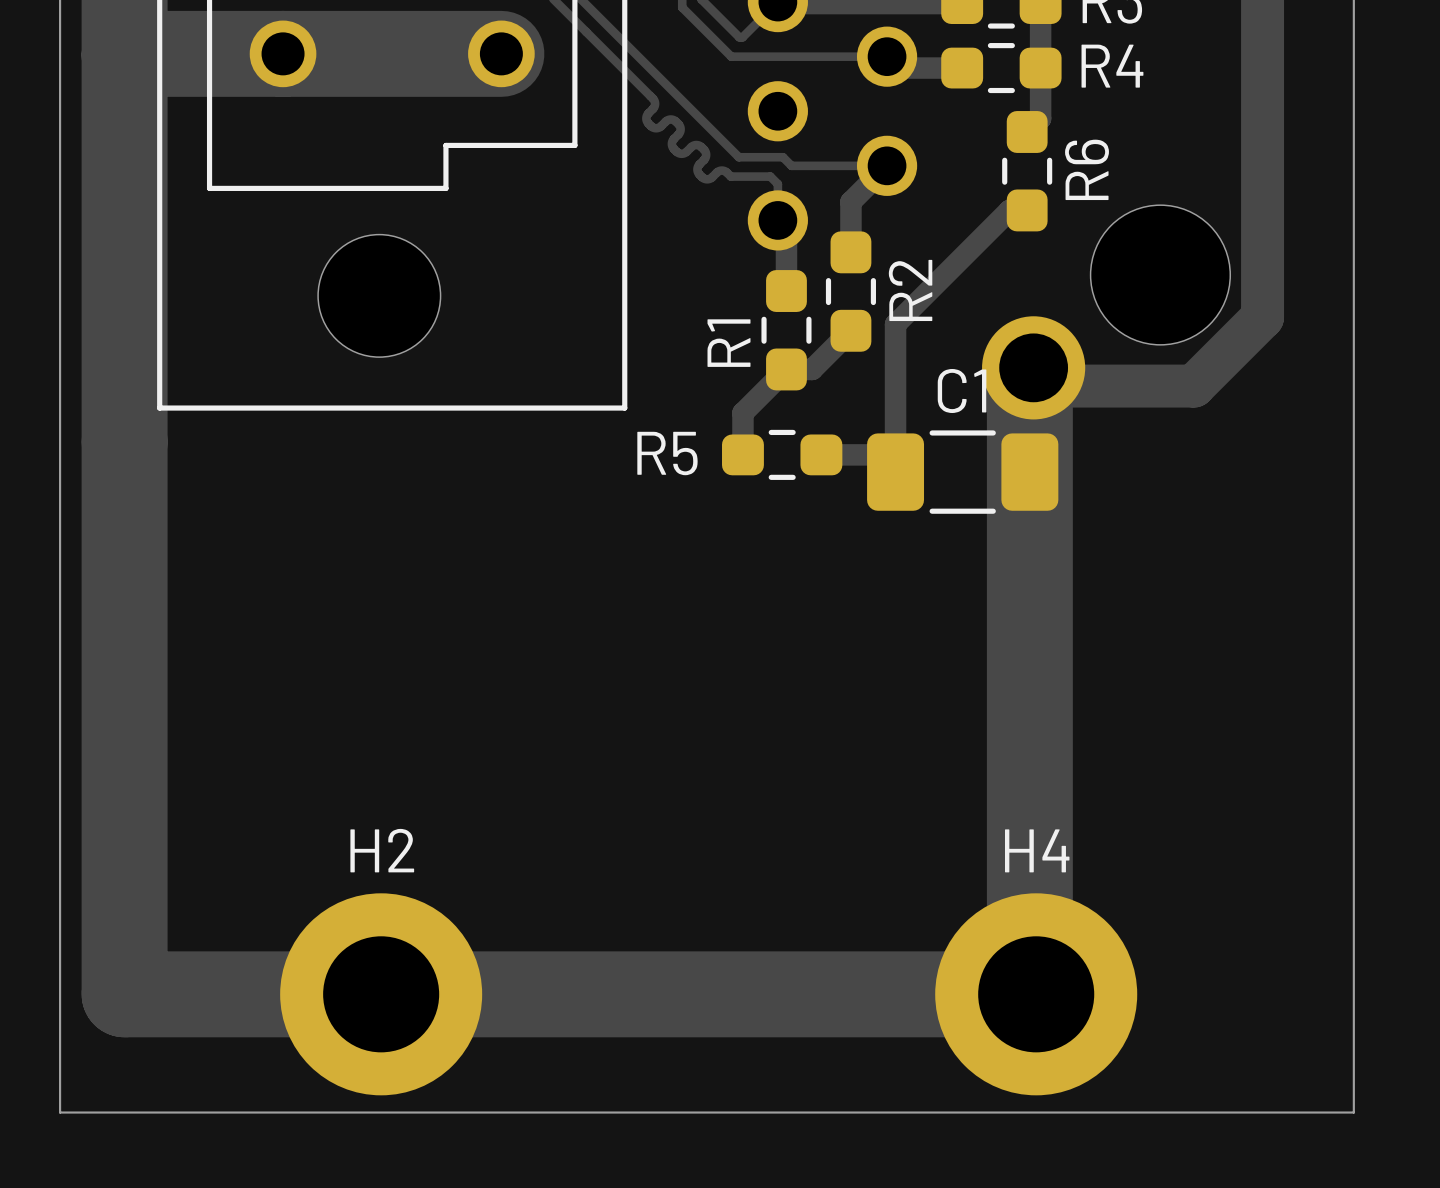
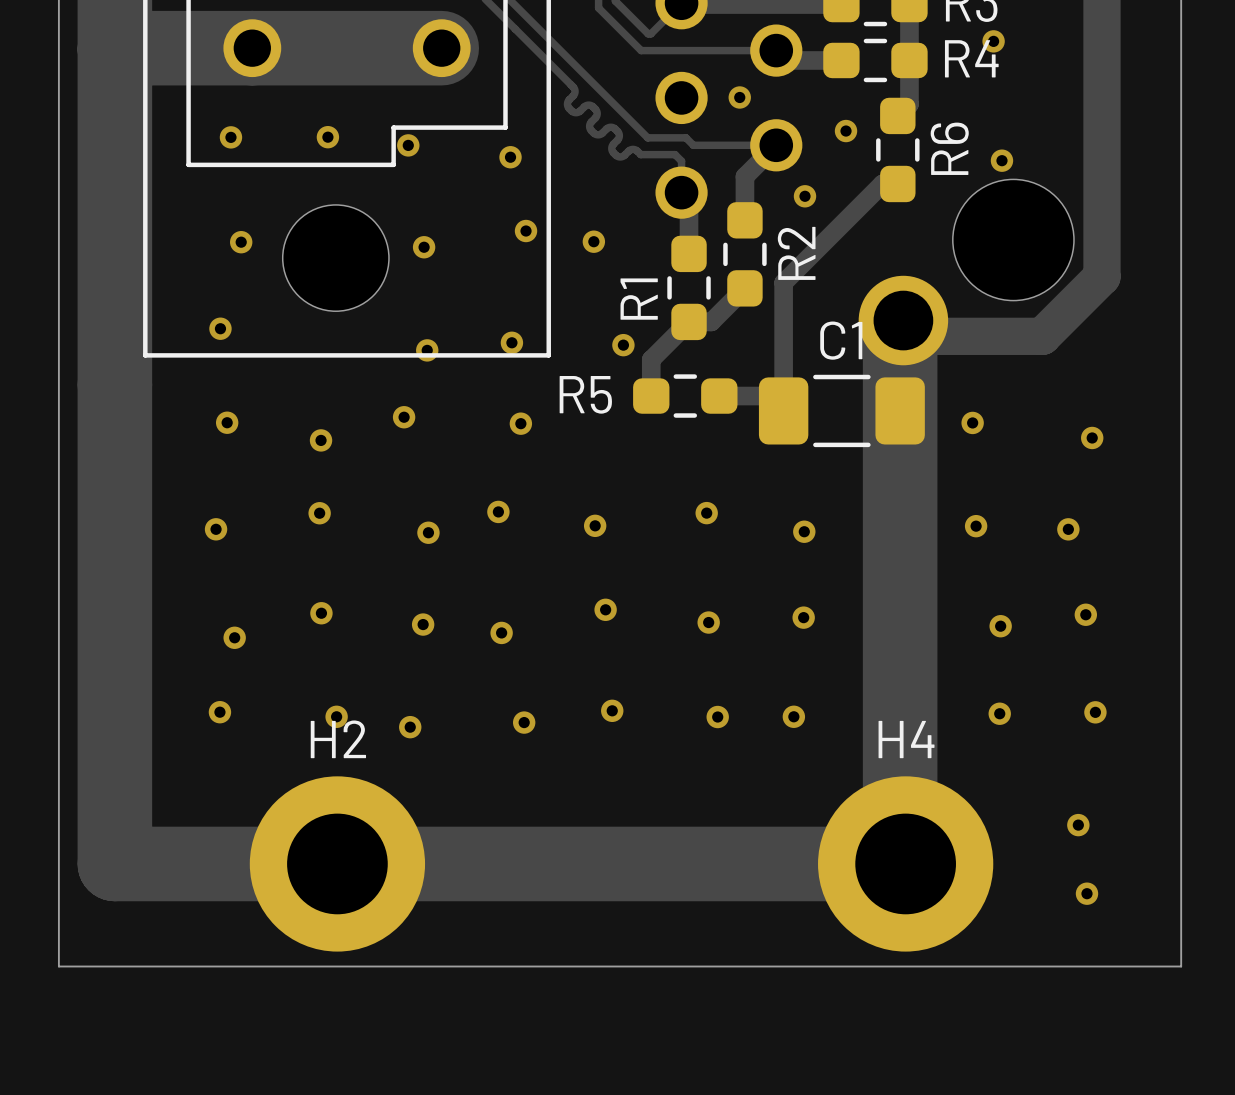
via: none -> (993, 41)
via: none -> (739, 97)
via: none -> (846, 131)
via: none -> (230, 137)
via: none -> (327, 137)
via: none -> (408, 145)
via: none -> (510, 157)
via: none -> (1001, 160)
via: none -> (805, 196)
via: none -> (526, 231)
via: none -> (593, 241)
via: none -> (241, 242)
via: none -> (424, 247)
via: none -> (220, 328)
via: none -> (511, 342)
via: none -> (623, 345)
via: none -> (427, 350)
via: none -> (404, 417)
via: none -> (227, 422)
via: none -> (972, 422)
via: none -> (520, 423)
via: none -> (1092, 437)
via: none -> (321, 440)
via: none -> (498, 511)
via: none -> (706, 513)
via: none -> (319, 513)
via: none -> (595, 525)
via: none -> (976, 526)
via: none -> (216, 529)
via: none -> (1068, 529)
via: none -> (804, 531)
via: none -> (428, 532)
via: none -> (605, 609)
via: none -> (321, 613)
via: none -> (1085, 614)
via: none -> (803, 617)
via: none -> (708, 622)
via: none -> (423, 624)
via: none -> (1000, 626)
via: none -> (501, 632)
via: none -> (234, 637)
via: none -> (612, 710)
via: none -> (219, 712)
via: none -> (1095, 712)
via: none -> (999, 713)
via: none -> (336, 716)
via: none -> (717, 717)
via: none -> (793, 716)
via: none -> (524, 722)
via: none -> (410, 727)
via: none -> (1078, 825)
via: none -> (1086, 893)

